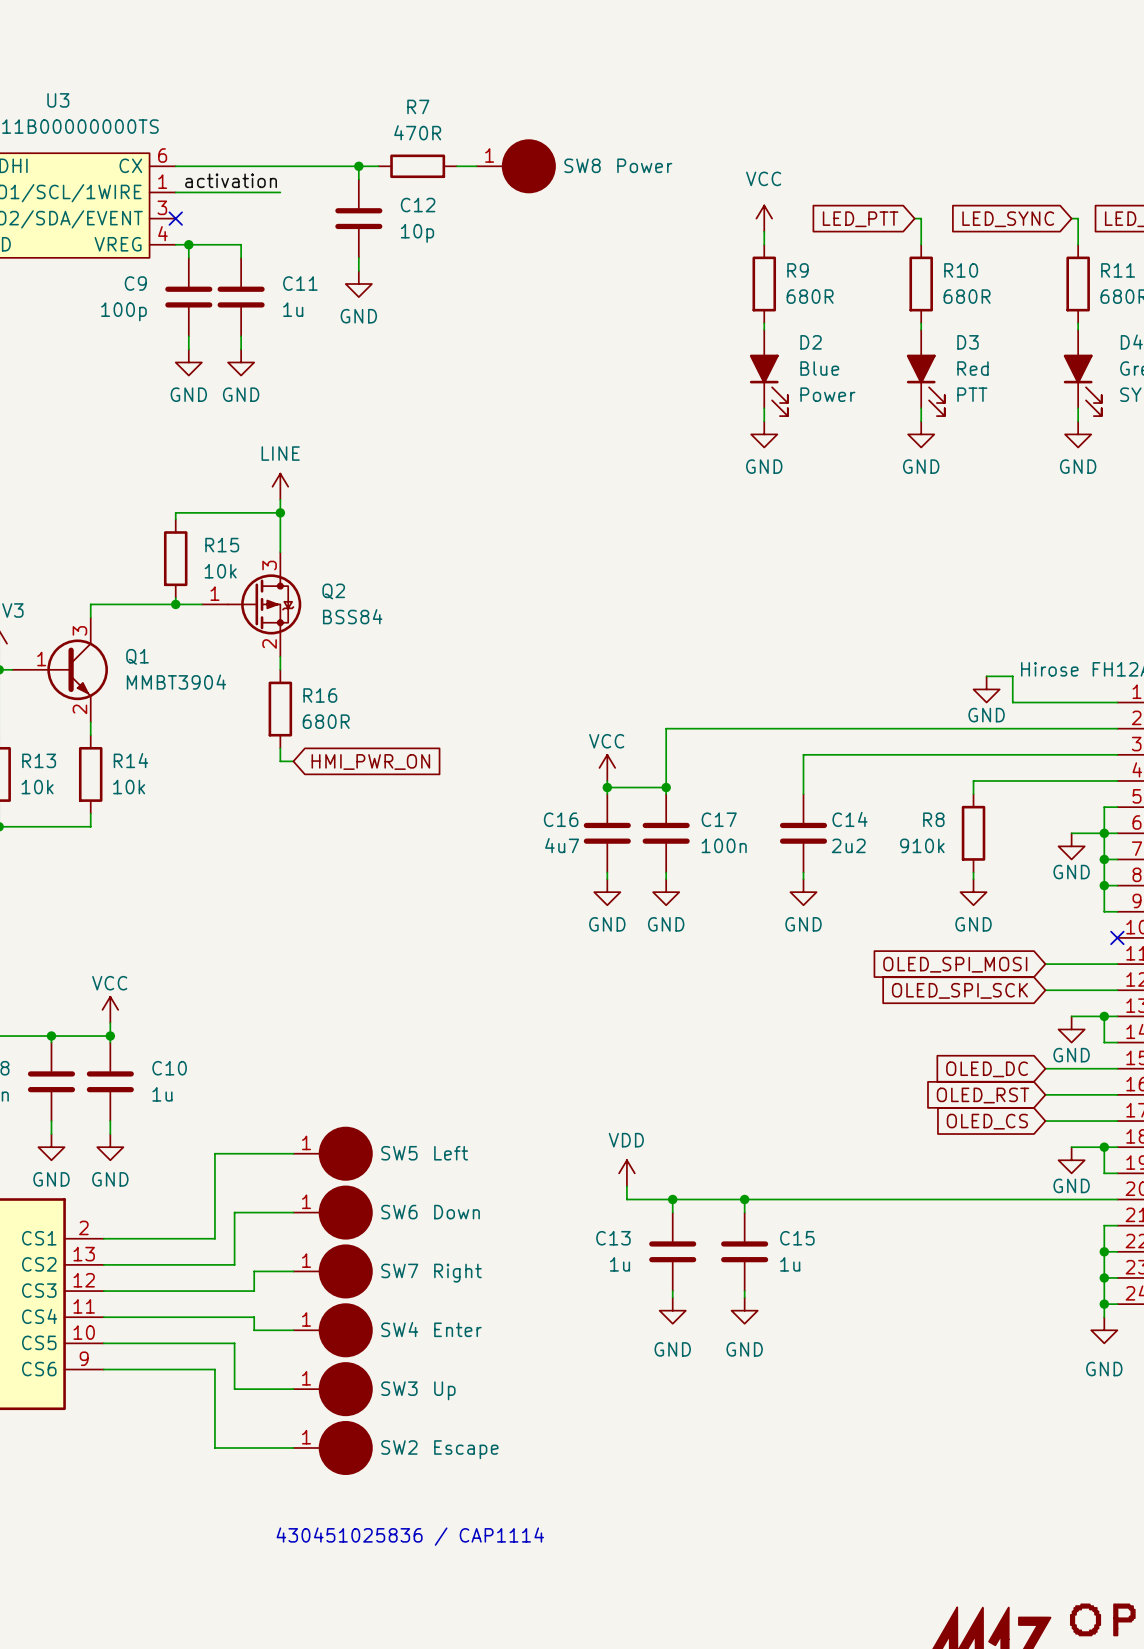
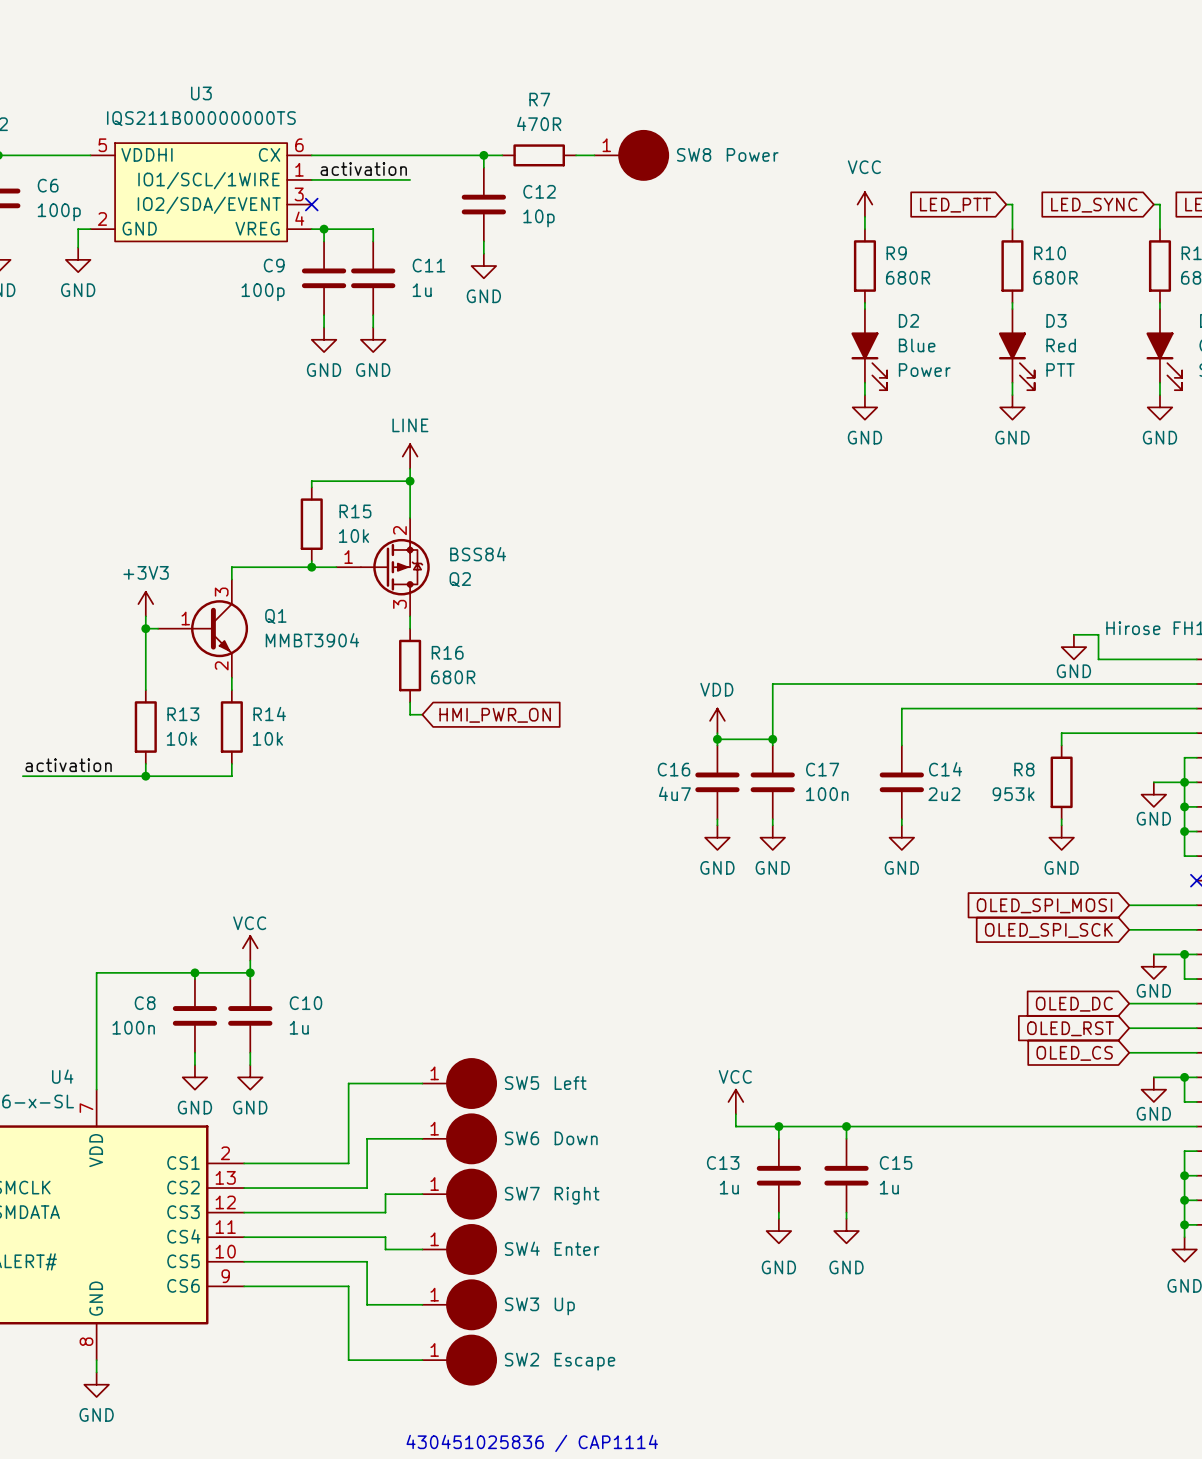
Q2 flip: as is (264, 604) -> up-down (395, 567)
power symbol: VCC (607, 767) -> VDD (717, 720)
R8 value: 910k (922, 845) -> 953k (1013, 794)
power symbol: VDD (626, 1173) -> VCC (735, 1101)

